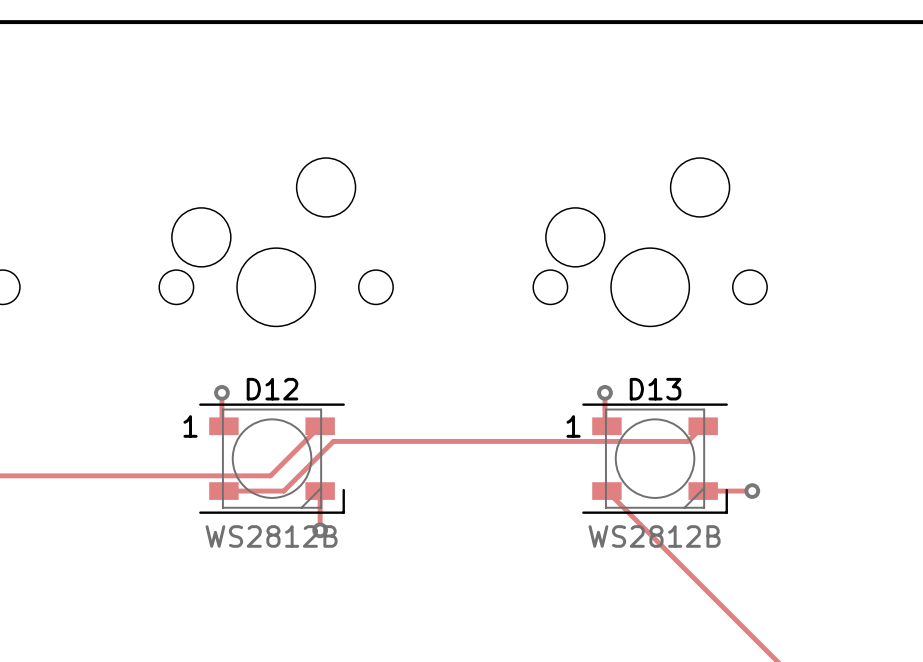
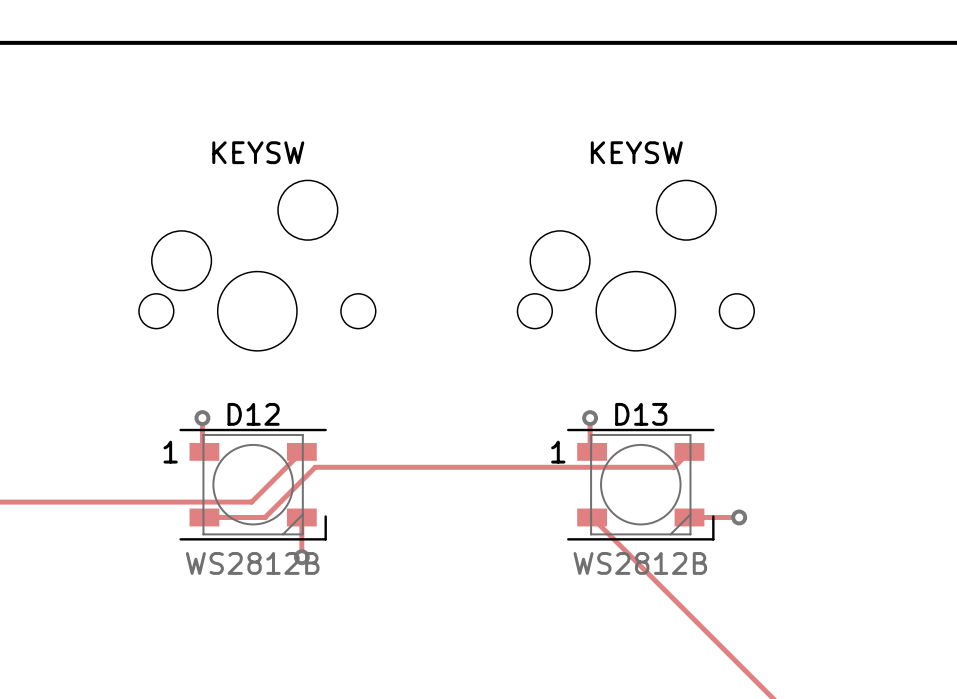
part value: none -> KEYSW (258, 152)
part value: none -> KEYSW (636, 152)

